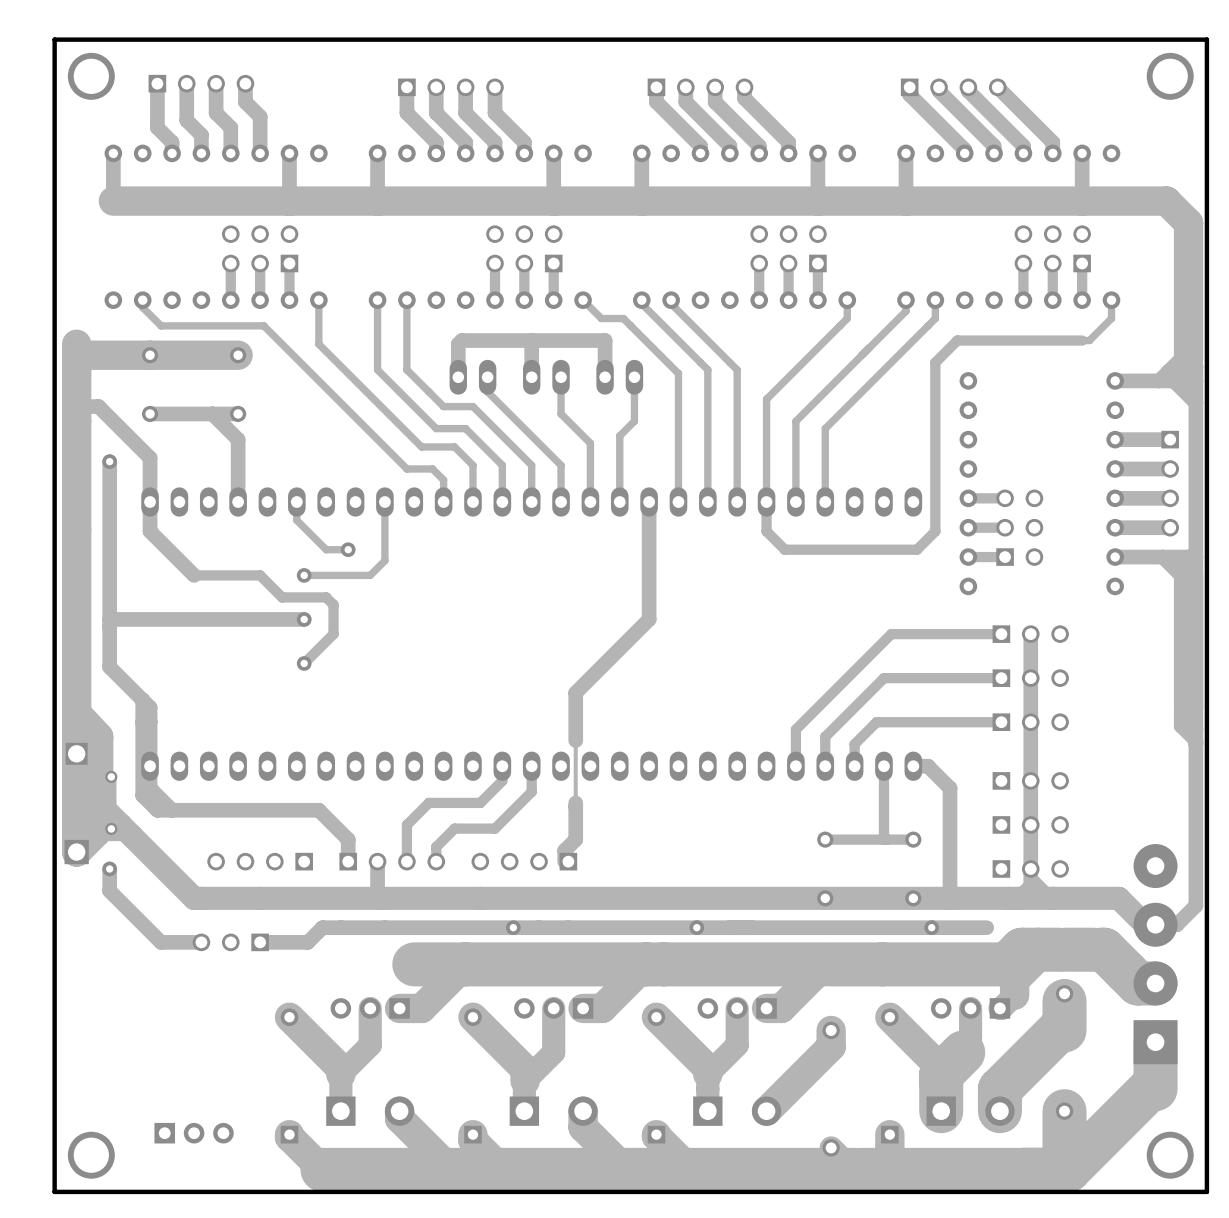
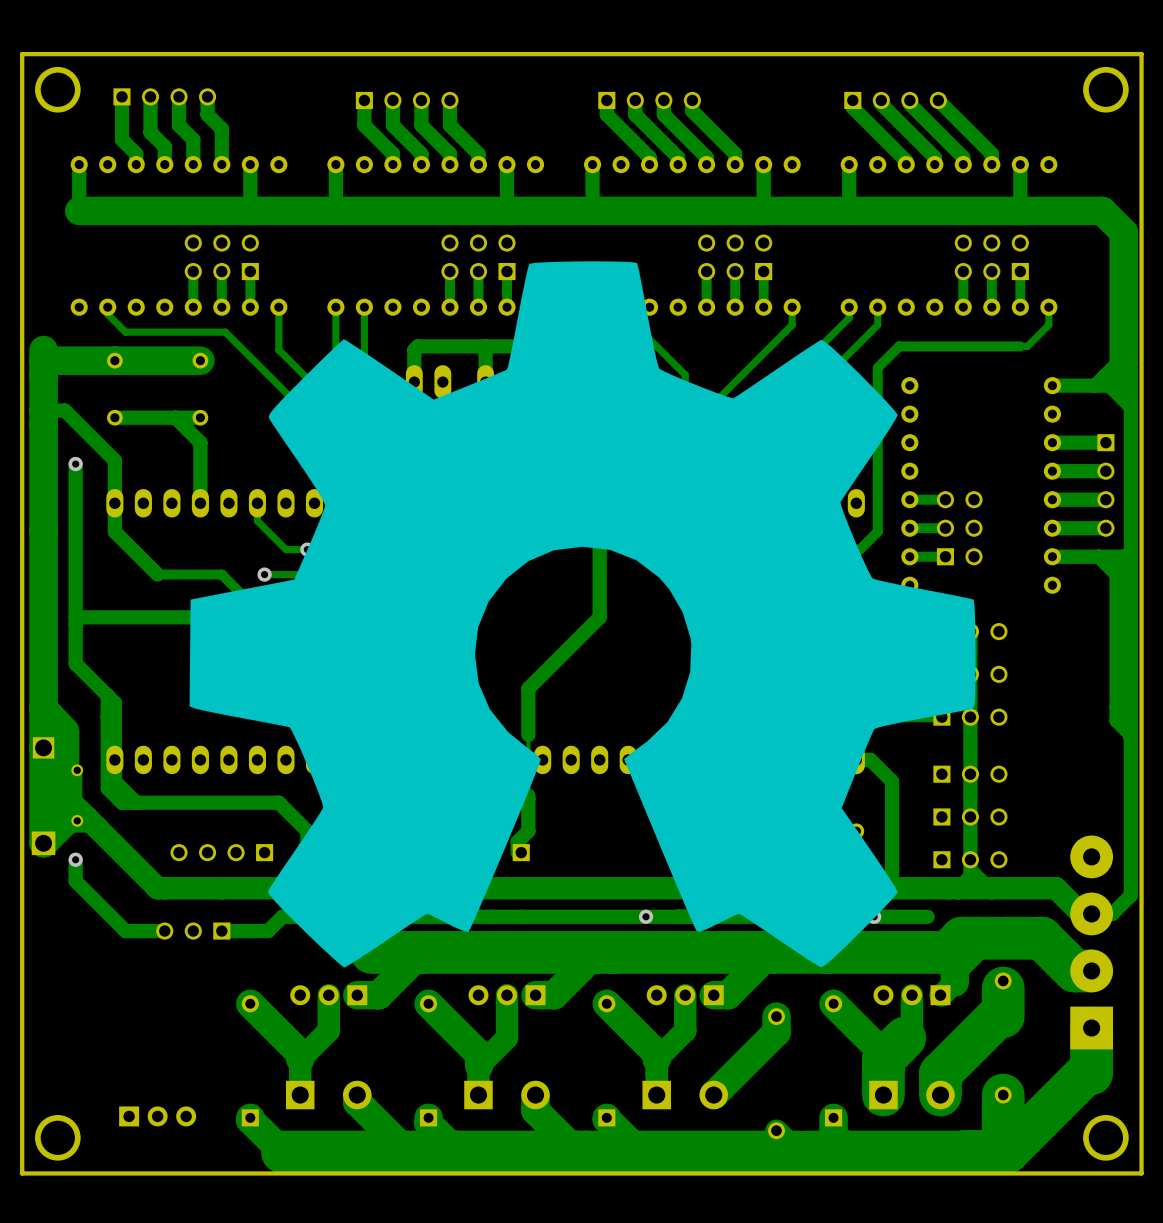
drawing: none -> [189, 261, 976, 968]

